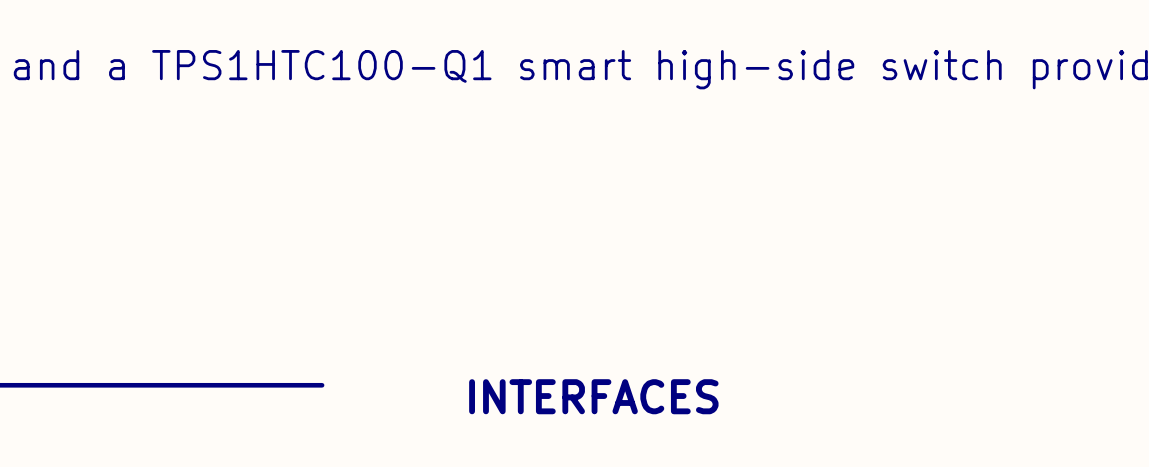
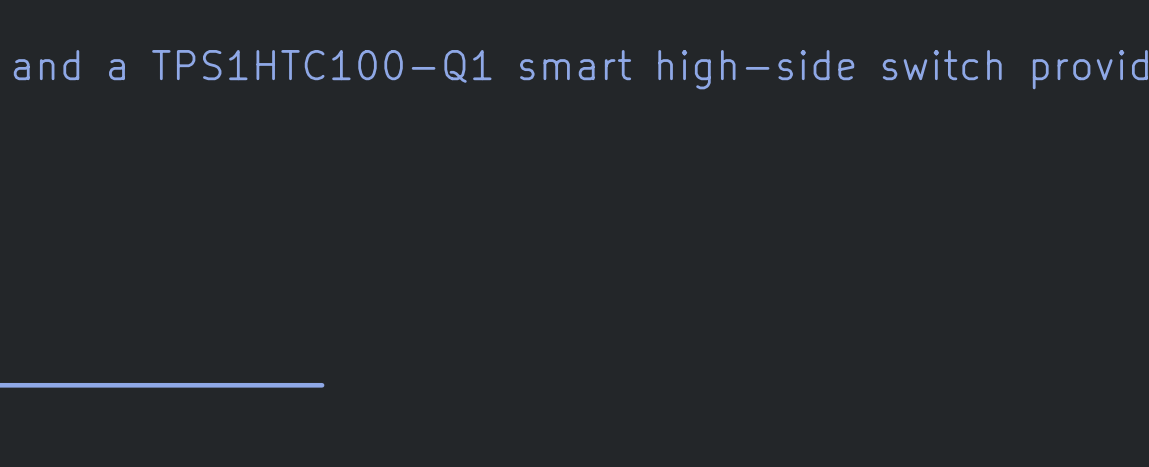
text: INTERFACES (593, 396) -> none

